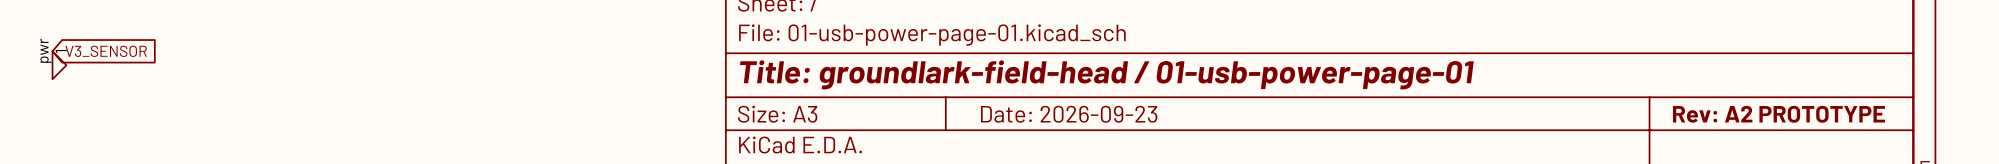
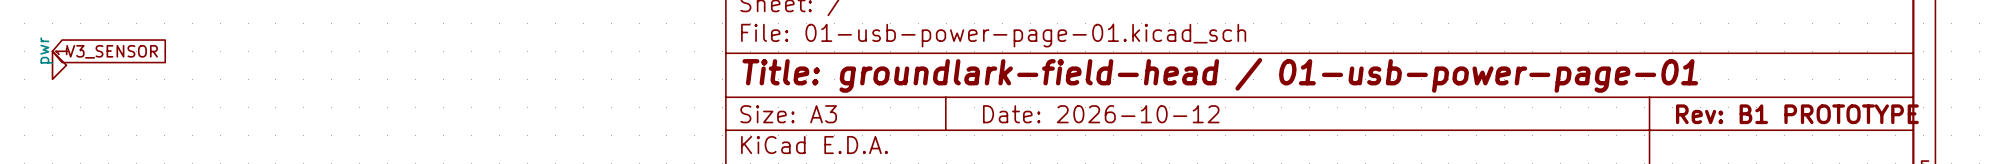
title block: Date: 2026-09-23 (1069, 114) -> Date: 2026-10-12 (1101, 114)
title block: Rev: A2 PROTOTYPE (1778, 114) -> Rev: B1 PROTOTYPE (1797, 114)

